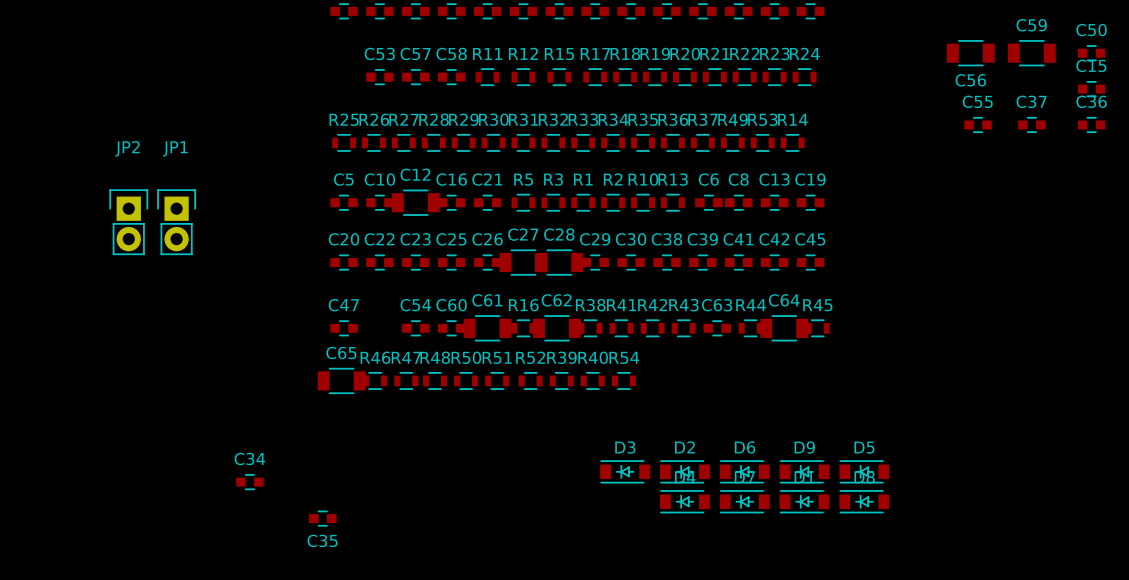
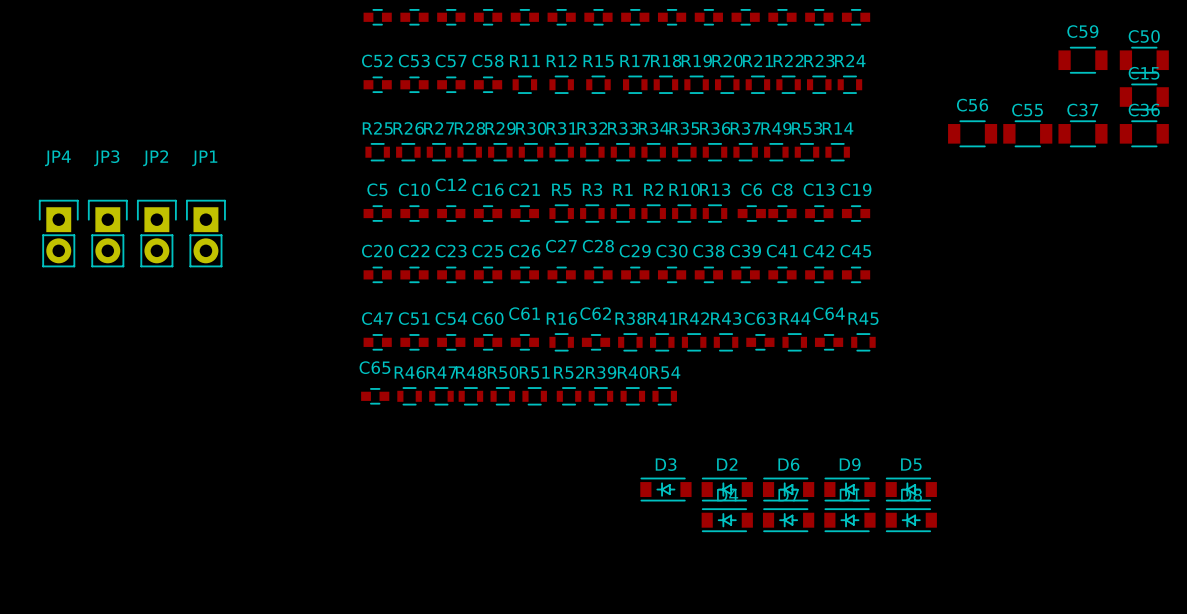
C50 footprint: [1077, 45, 1106, 62] -> [1119, 46, 1169, 74]
C56 position: (970, 53) -> (972, 133)
C52: none -> (377, 84)
C56 name position: C56 (970, 80) -> C56 (972, 105)
C15 footprint: [1077, 81, 1106, 98] -> [1119, 83, 1169, 111]
C55 footprint: [964, 116, 992, 134] -> [1003, 120, 1053, 148]
C37 footprint: [1018, 116, 1046, 134] -> [1058, 120, 1108, 148]
C36 footprint: [1077, 116, 1106, 134] -> [1119, 120, 1169, 148]
C12 footprint: [391, 189, 440, 216] -> [437, 205, 466, 222]
JP4: none -> (58, 233)
JP3: none -> (107, 233)
C27 footprint: [499, 249, 548, 276] -> [547, 266, 576, 284]
C28 footprint: [535, 249, 584, 276] -> [584, 266, 613, 284]
C61 footprint: [463, 315, 512, 342] -> [510, 334, 539, 351]
C62 footprint: [533, 315, 581, 342] -> [581, 334, 611, 351]
C64 footprint: [760, 315, 809, 342] -> [814, 334, 844, 351]
C51: none -> (414, 342)
C65 footprint: [317, 367, 366, 395] -> [361, 388, 390, 405]
C34: (249, 482) -> none
C35: (322, 518) -> none

